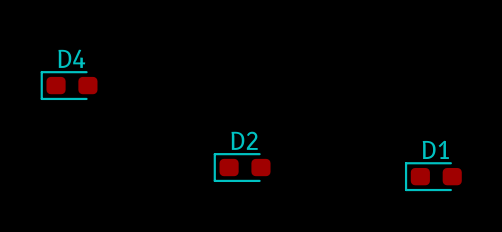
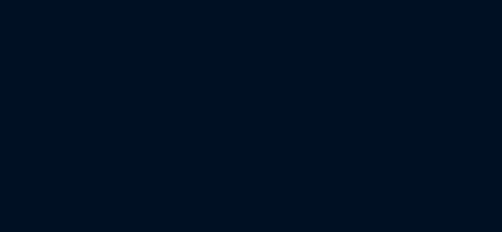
D4: (69, 85) -> none
D2: (242, 167) -> none
D1: (433, 176) -> none

